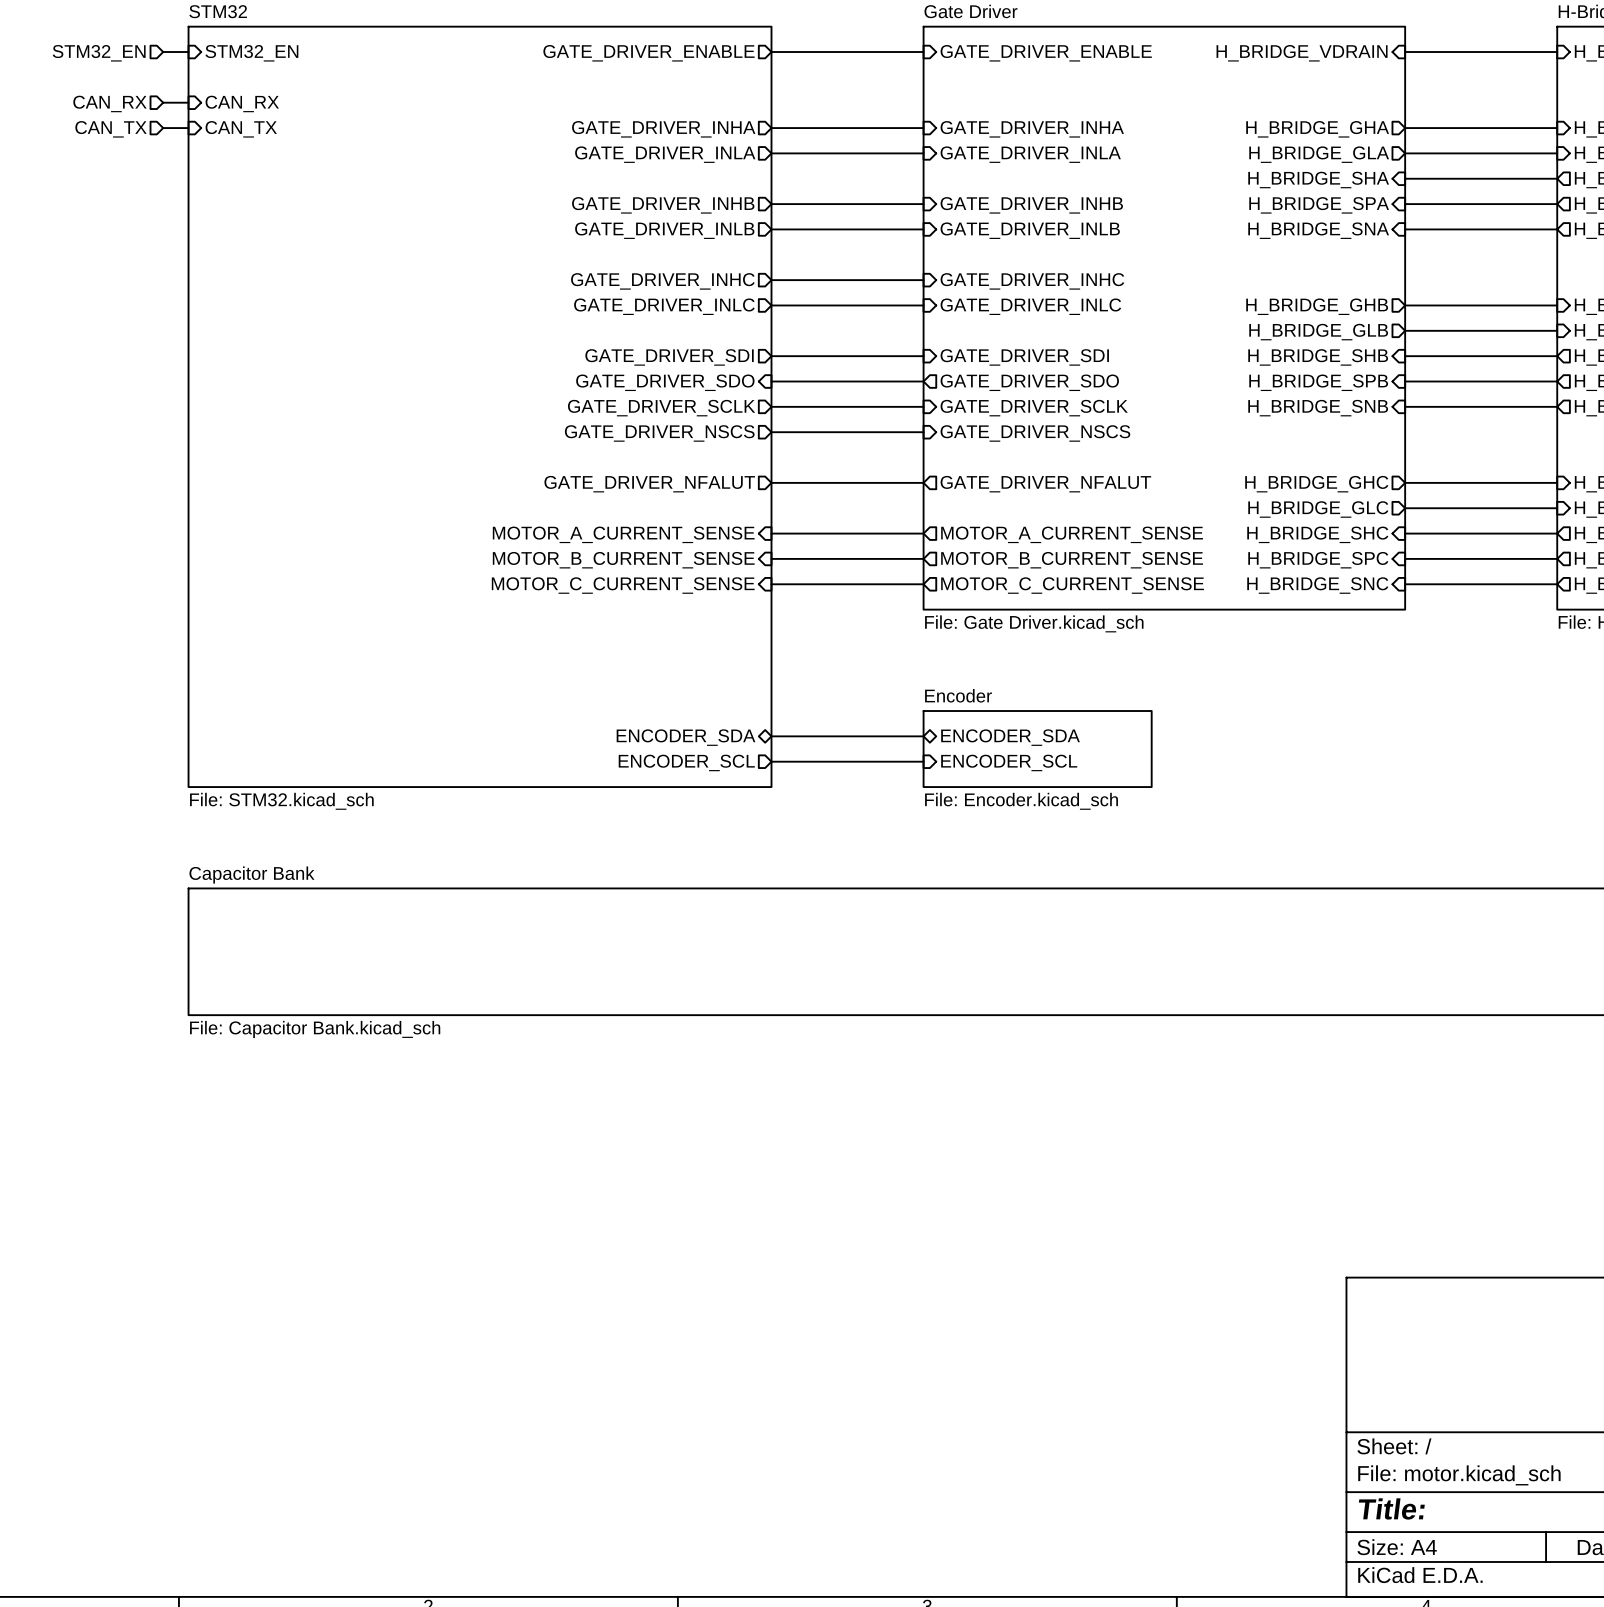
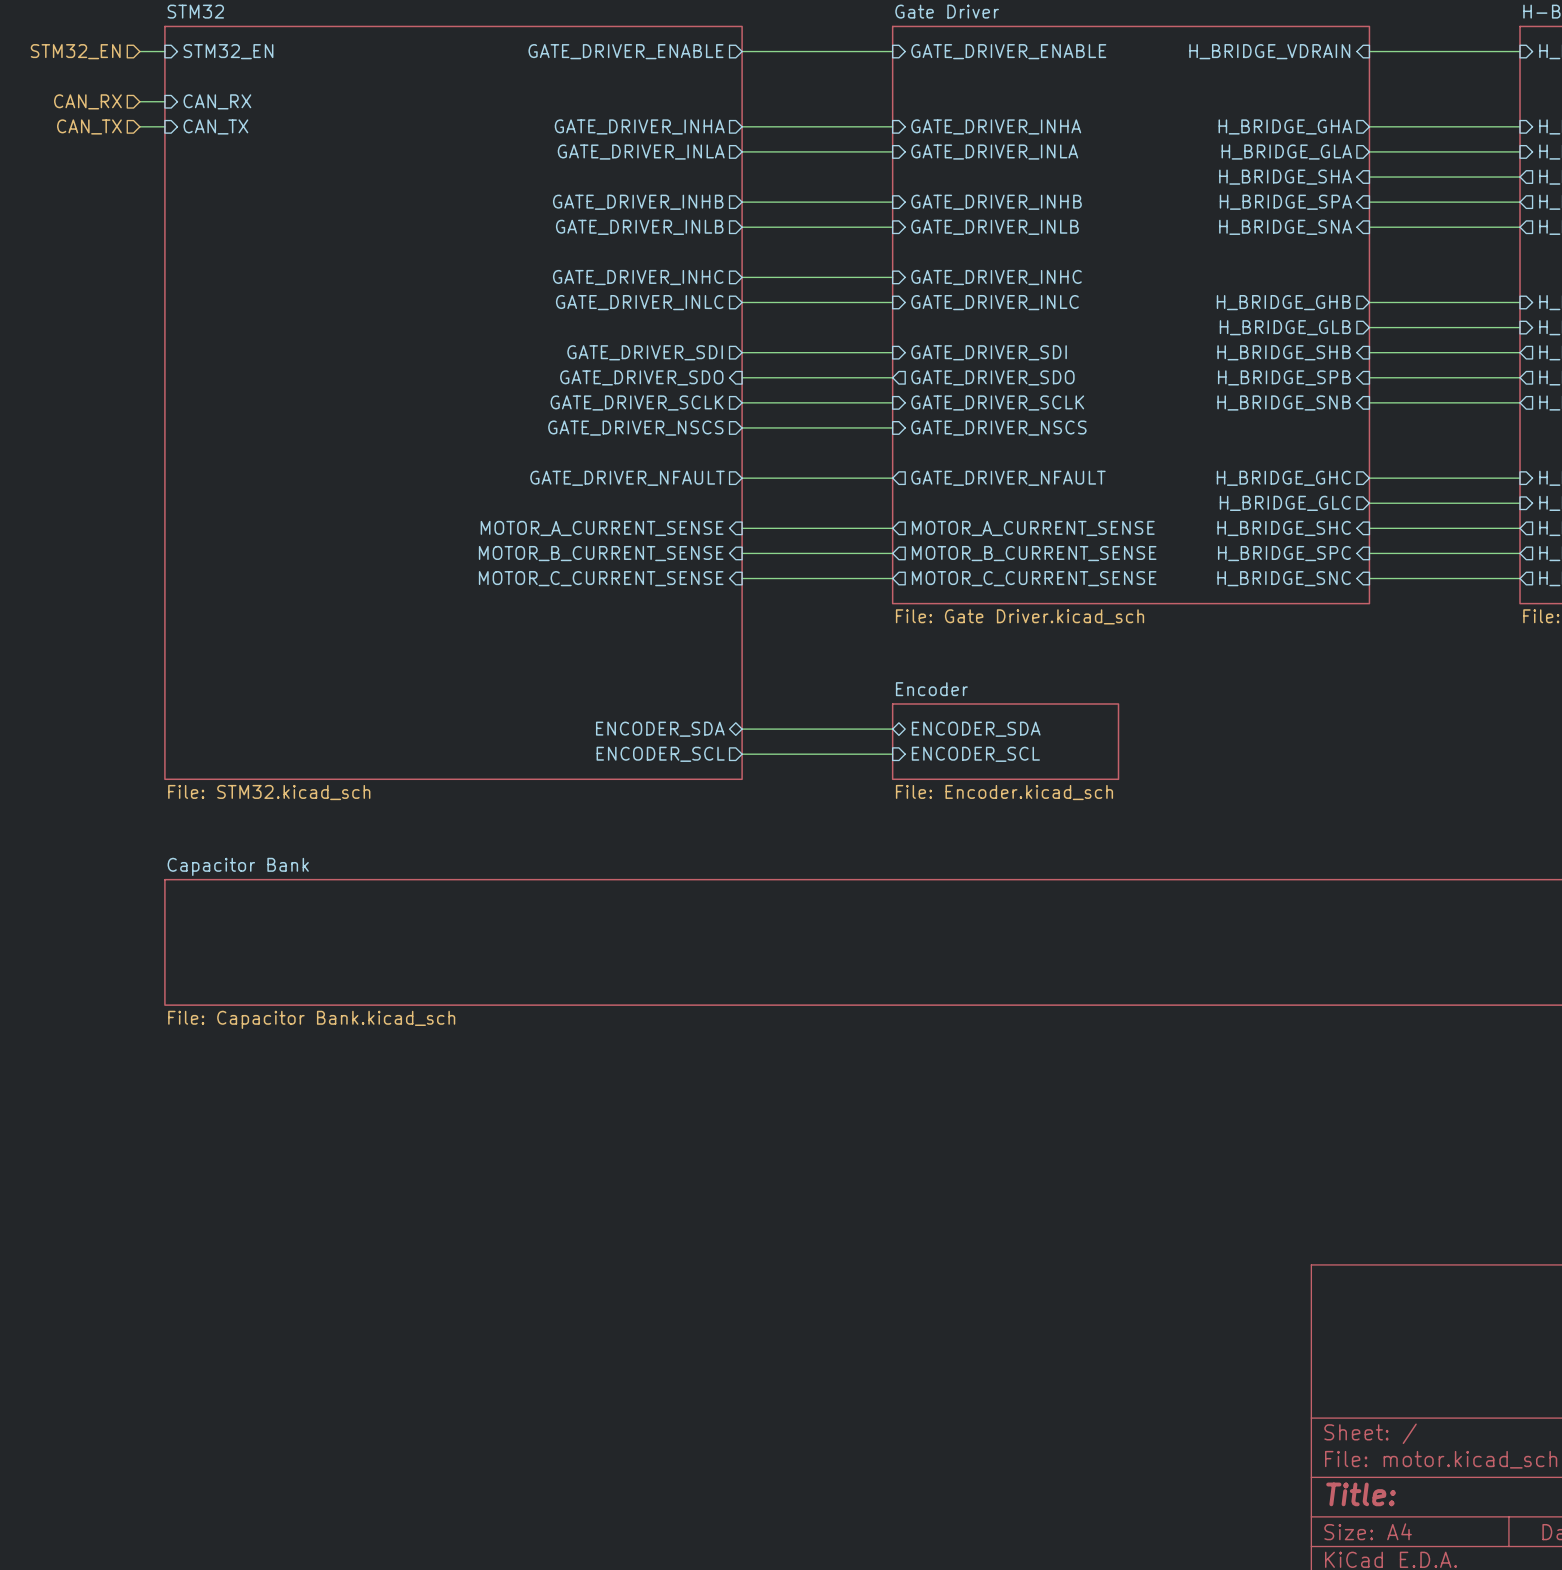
sheet pin: GATE_DRIVER_NFALUT (649, 484) -> GATE_DRIVER_NFAULT (627, 478)
sheet pin: GATE_DRIVER_NFALUT (1045, 484) -> GATE_DRIVER_NFAULT (1008, 478)

